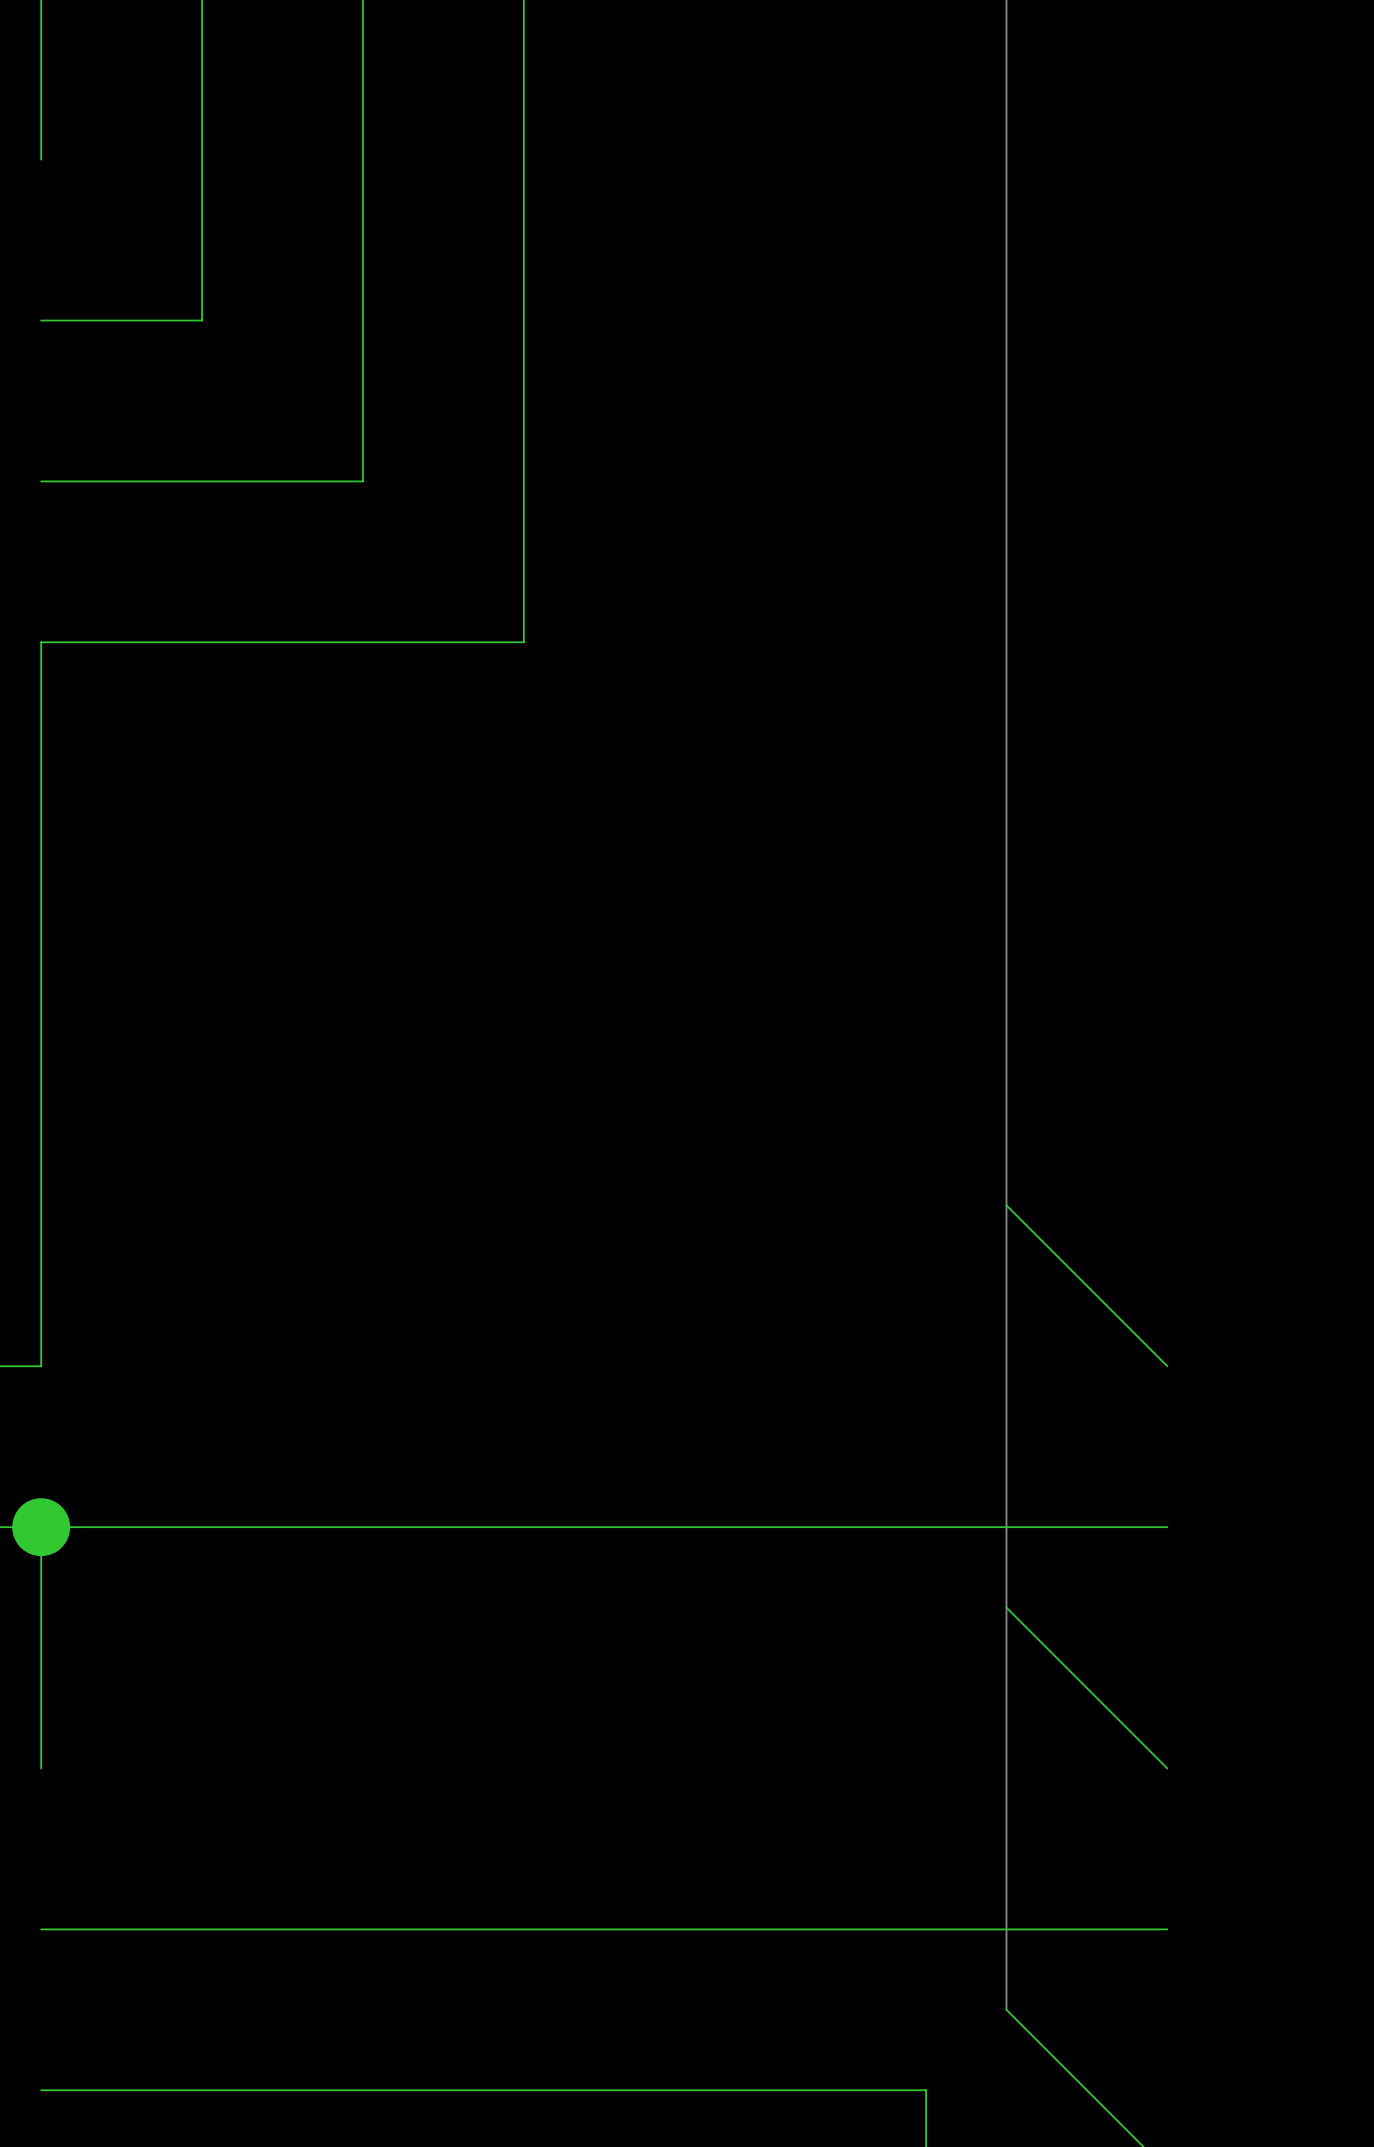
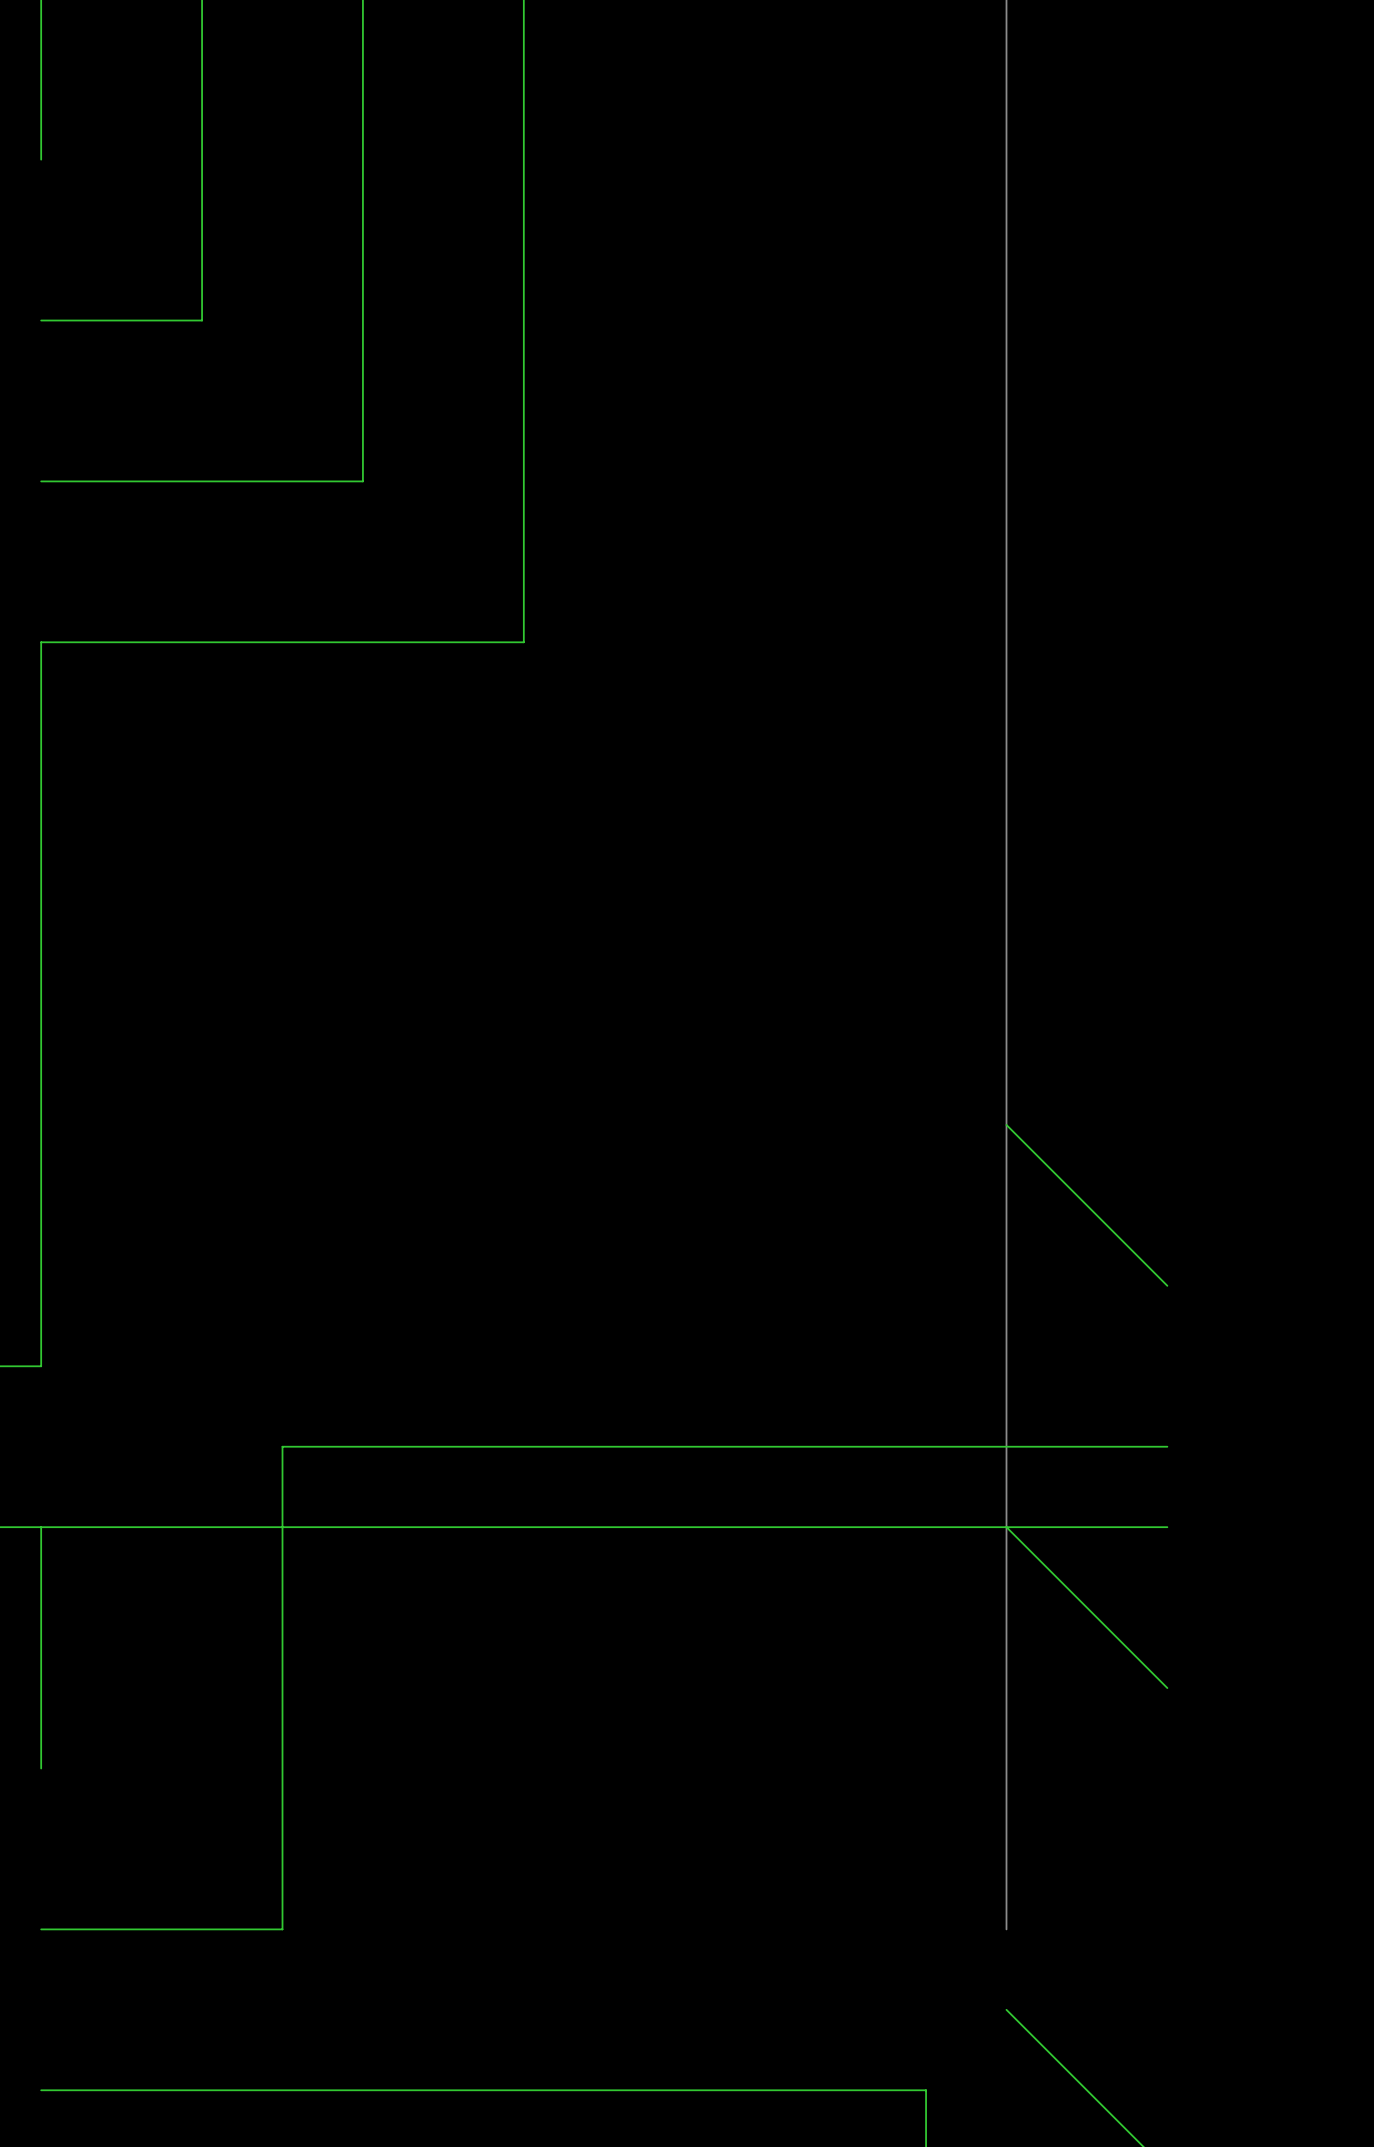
wire: (1006, 1205) (1167, 1366) -> (1006, 1124) (1167, 1285)
junction: (41, 1527) -> none
wire: (1006, 1607) (1167, 1768) -> (1006, 1527) (1167, 1688)
wire: (282, 1929) (1167, 1929) -> (282, 1929) (282, 1446) (1167, 1446)
bus: (1006, 1929) (1006, 2009) -> none

